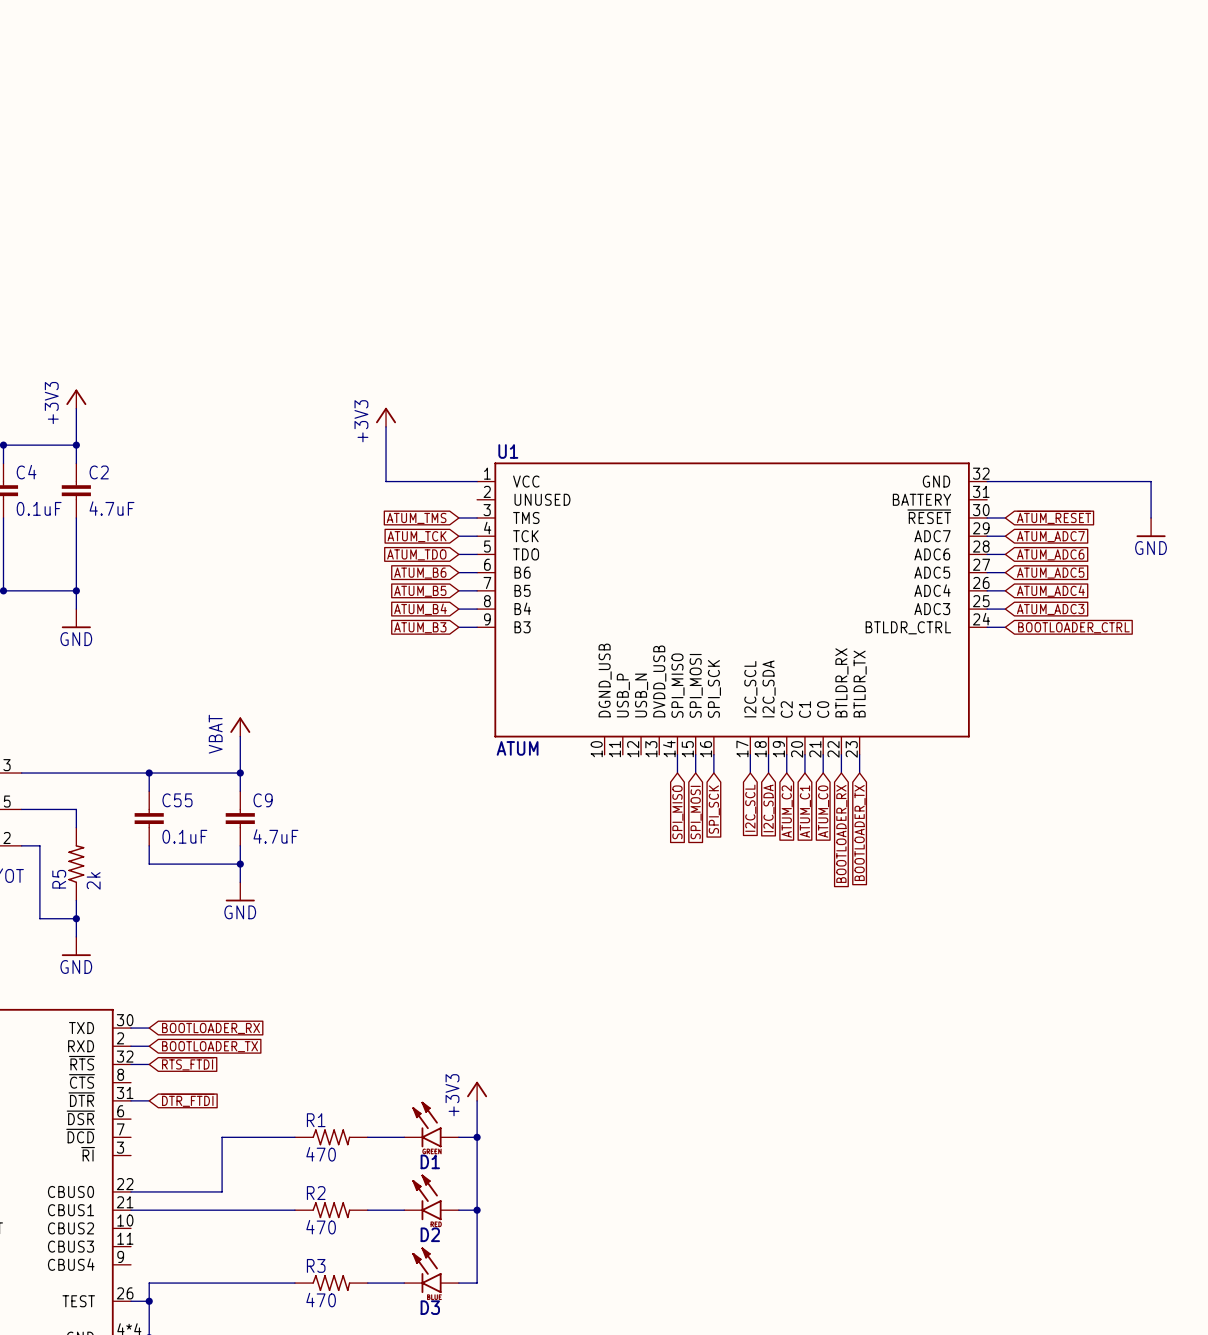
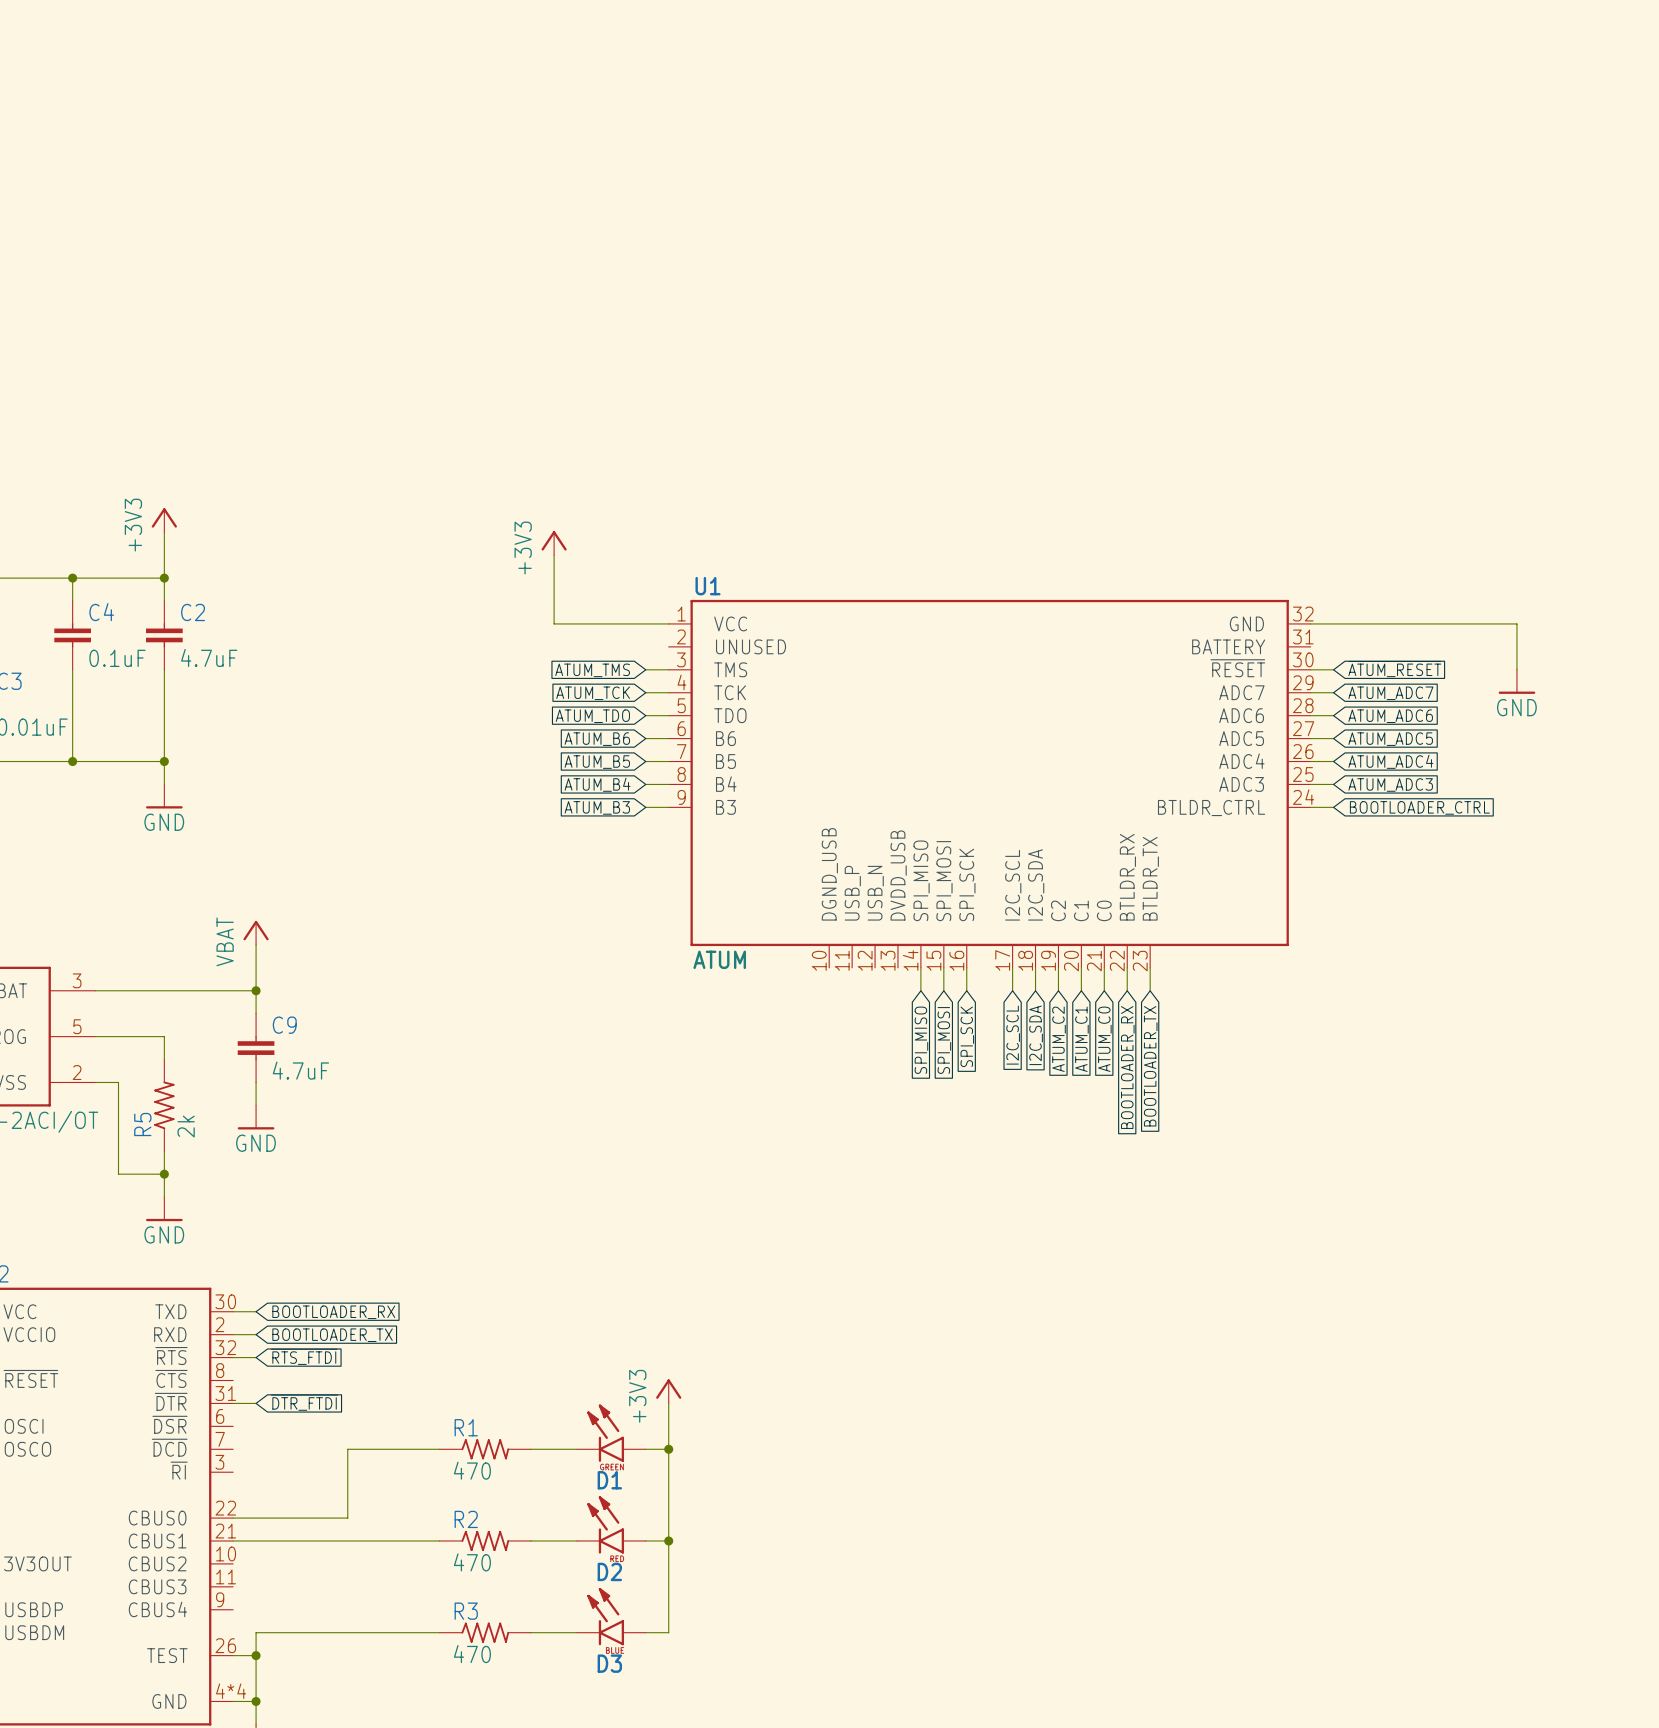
power symbol position: VBAT (240, 727) -> VBAT (256, 932)
wire: (240, 736) (240, 791) -> none
wire: (149, 773) (240, 773) -> (256, 990) (256, 944)
junction: (240, 773) -> none
C55 name: C55 (177, 800) -> C9 (284, 1025)
C9: 4.7uF (240, 818) -> none
C55 value: 0.1uF (184, 836) -> 4.7uF (300, 1070)
wire: (240, 845) (240, 882) -> none
wire: (149, 864) (240, 864) -> none
junction: (240, 864) -> none
power symbol position: GND (240, 891) -> GND (256, 1117)

